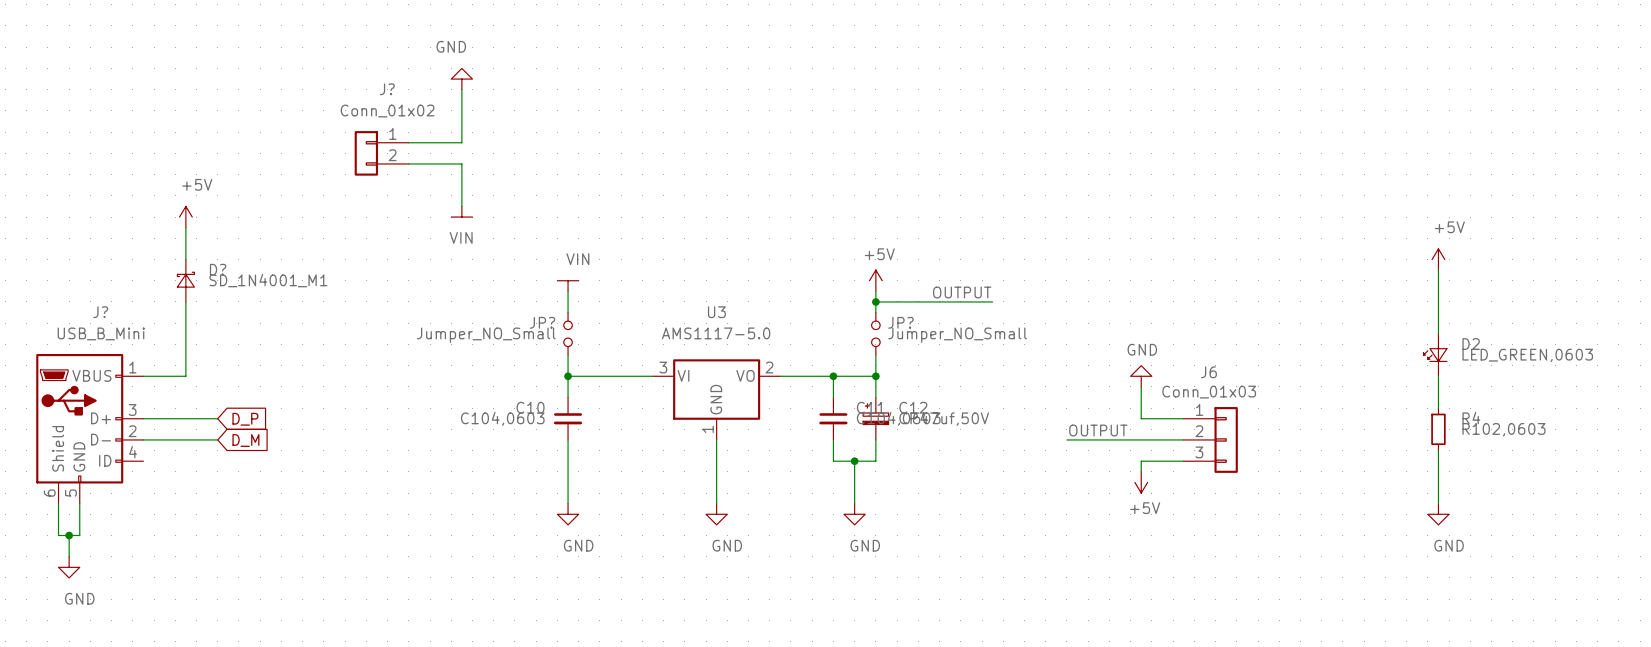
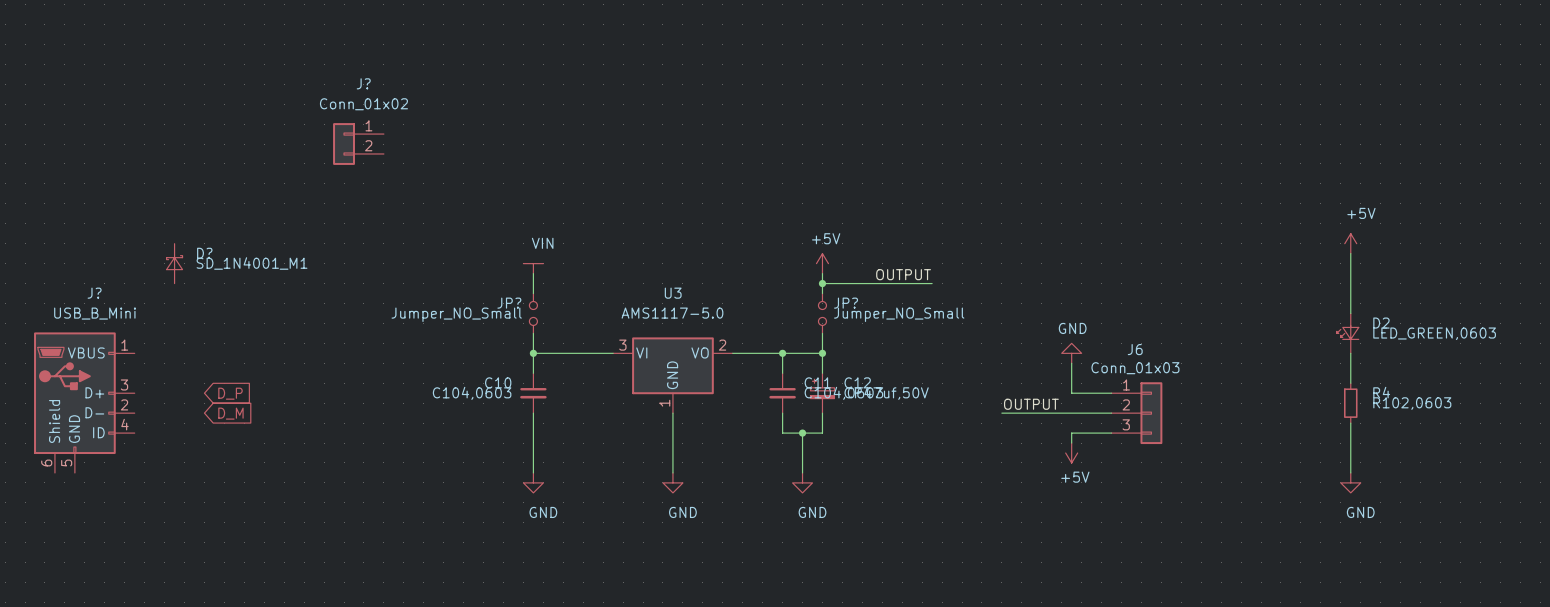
power symbol: GND (461, 79) -> none
wire: (461, 89) (461, 142) (408, 142) -> none
wire: (408, 163) (461, 163) (461, 206) -> none
power symbol: VIN (461, 211) -> none
power symbol: +5V (185, 217) -> none
wire: (185, 227) (185, 259) -> none
wire: (185, 301) (185, 376) (143, 376) -> none
wire: (143, 418) (217, 418) -> none
wire: (143, 439) (217, 439) -> none
wire: (58, 503) (58, 535) (79, 535) (79, 503) -> none
wire: (69, 535) (69, 556) -> none
junction: (69, 535) -> none
power symbol: GND (69, 567) -> none

